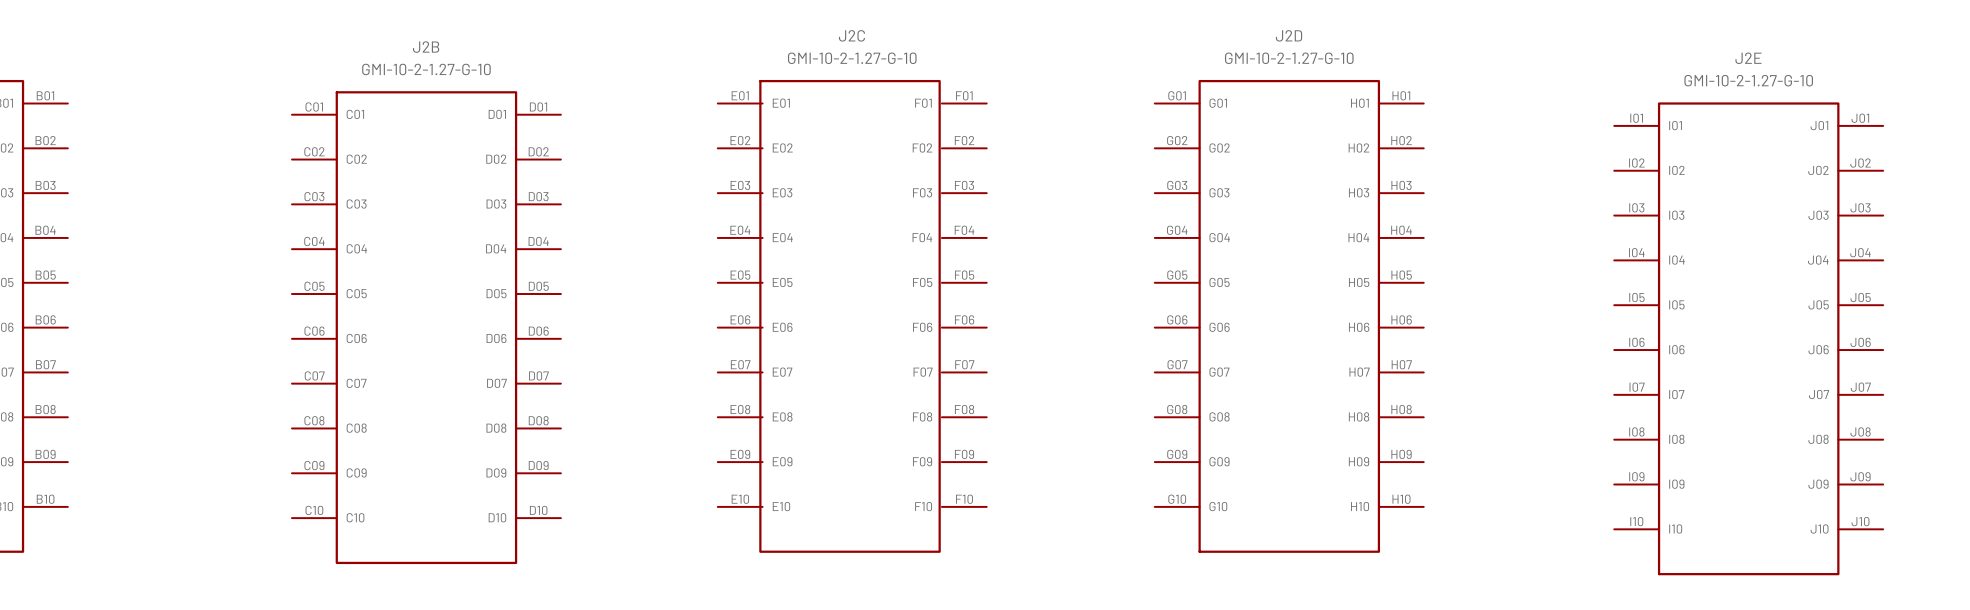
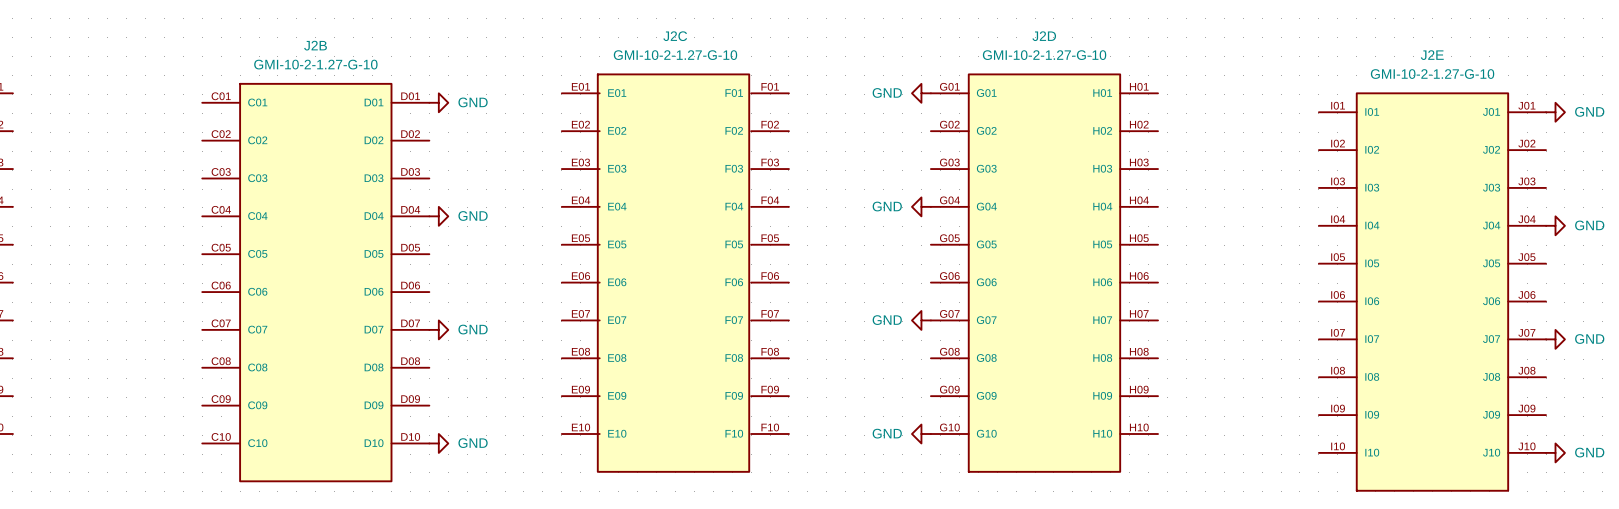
power symbol: none -> GND (921, 93)
power symbol: none -> GND (438, 102)
power symbol: none -> GND (1555, 112)
power symbol: none -> GND (921, 206)
power symbol: none -> GND (438, 216)
power symbol: none -> GND (1555, 225)
power symbol: none -> GND (921, 320)
power symbol: none -> GND (438, 329)
power symbol: none -> GND (1555, 339)
power symbol: none -> GND (921, 434)
power symbol: none -> GND (438, 443)
power symbol: none -> GND (1555, 452)

